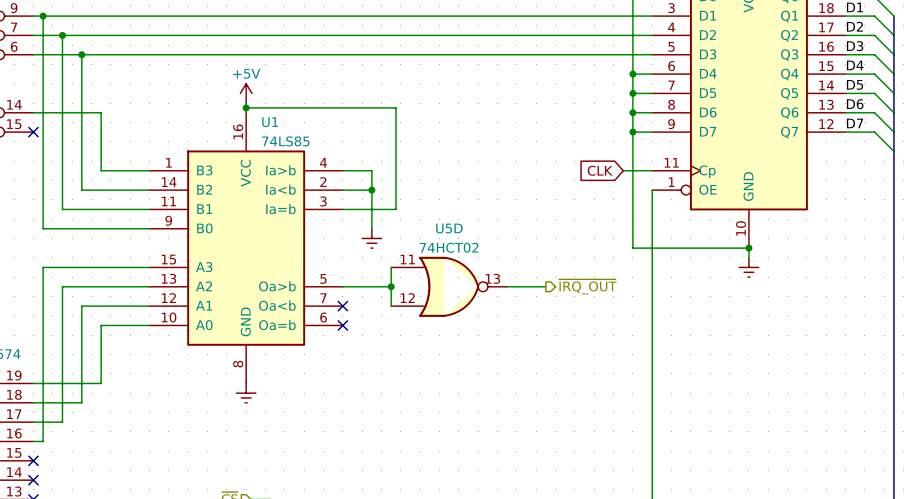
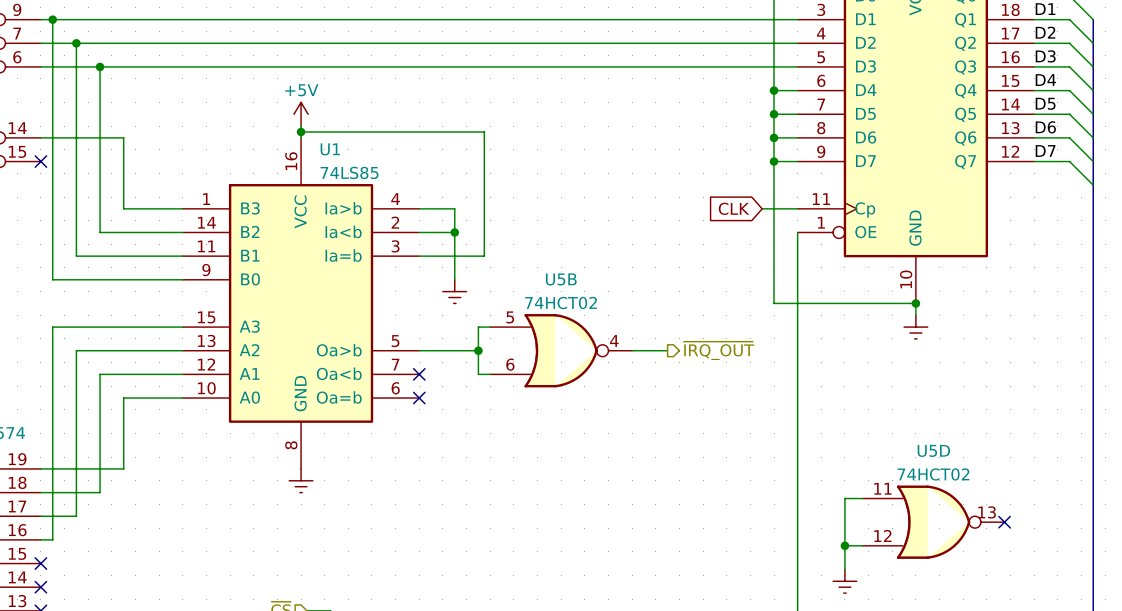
U5D position: (449, 286) -> (933, 522)
U5B: none -> 74HCT02 (561, 350)
wire: none -> (862, 498) (844, 498) (844, 569)
no-connect mark: none -> (1004, 522)
wire: none -> (844, 545) (862, 545)
junction: none -> (844, 545)
power symbol: none -> (844, 581)

